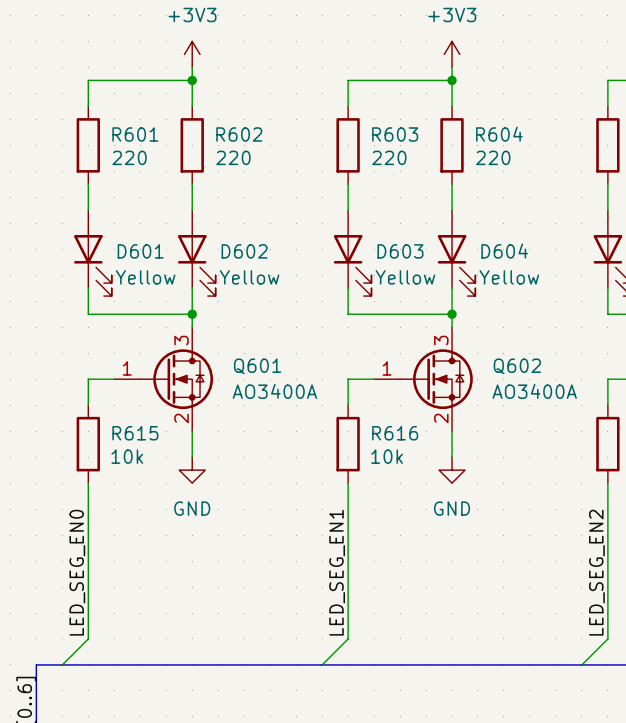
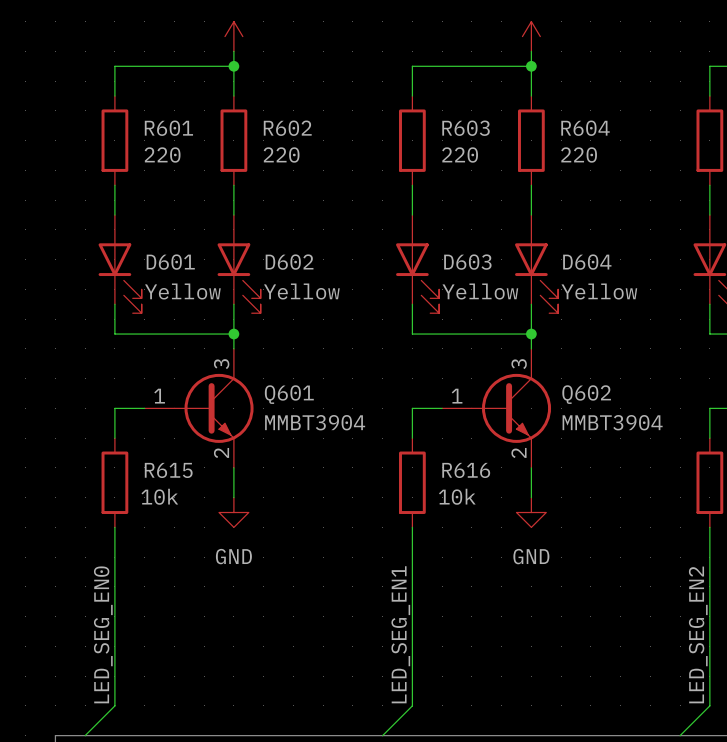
Q601 symbol: [114, 327, 214, 432] -> [144, 348, 254, 468]
Q602 symbol: [374, 327, 473, 432] -> [442, 348, 552, 468]
Q601 value: AO3400A (274, 391) -> MMBT3904 (315, 422)
Q602 value: AO3400A (534, 391) -> MMBT3904 (612, 422)

